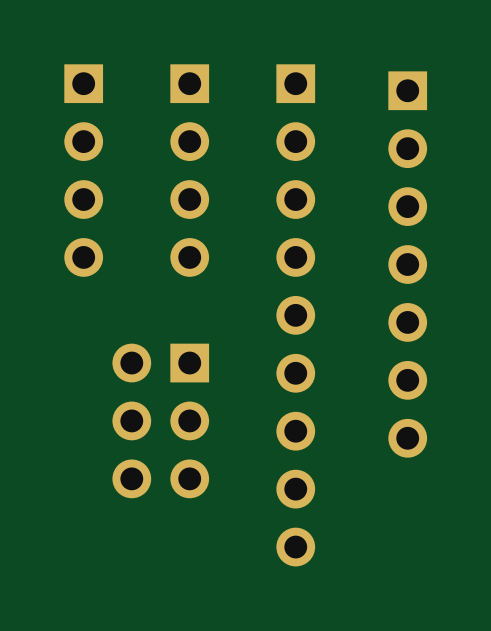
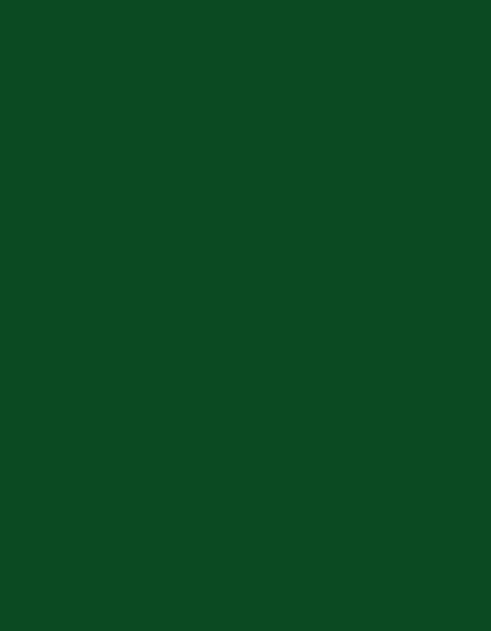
part: (83, 170) -> none
part: (189, 170) -> none
part: (407, 264) -> none
part: (295, 315) -> none
part: (160, 420) -> none

